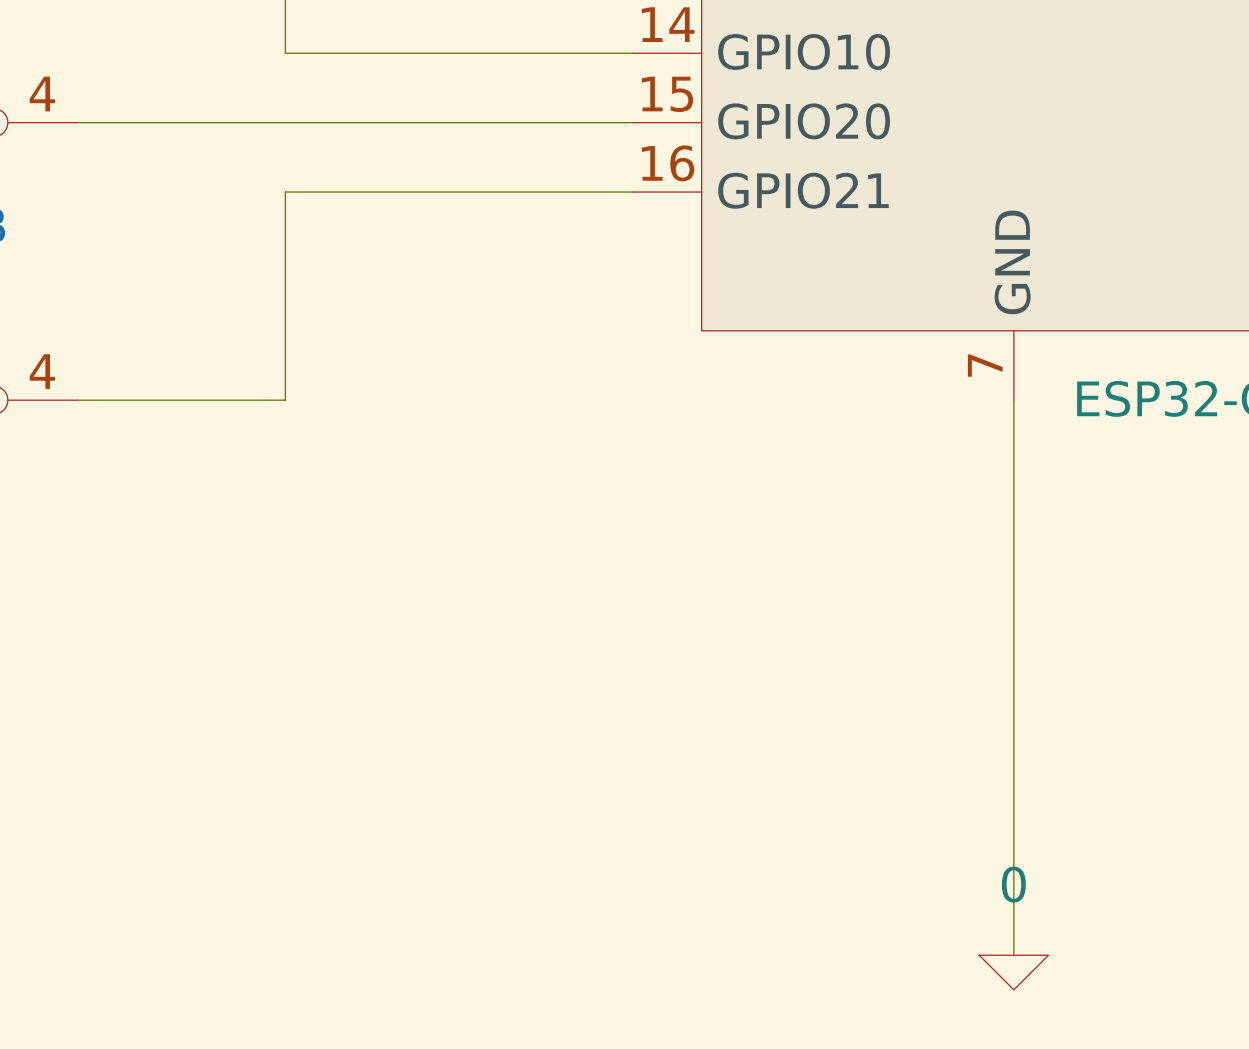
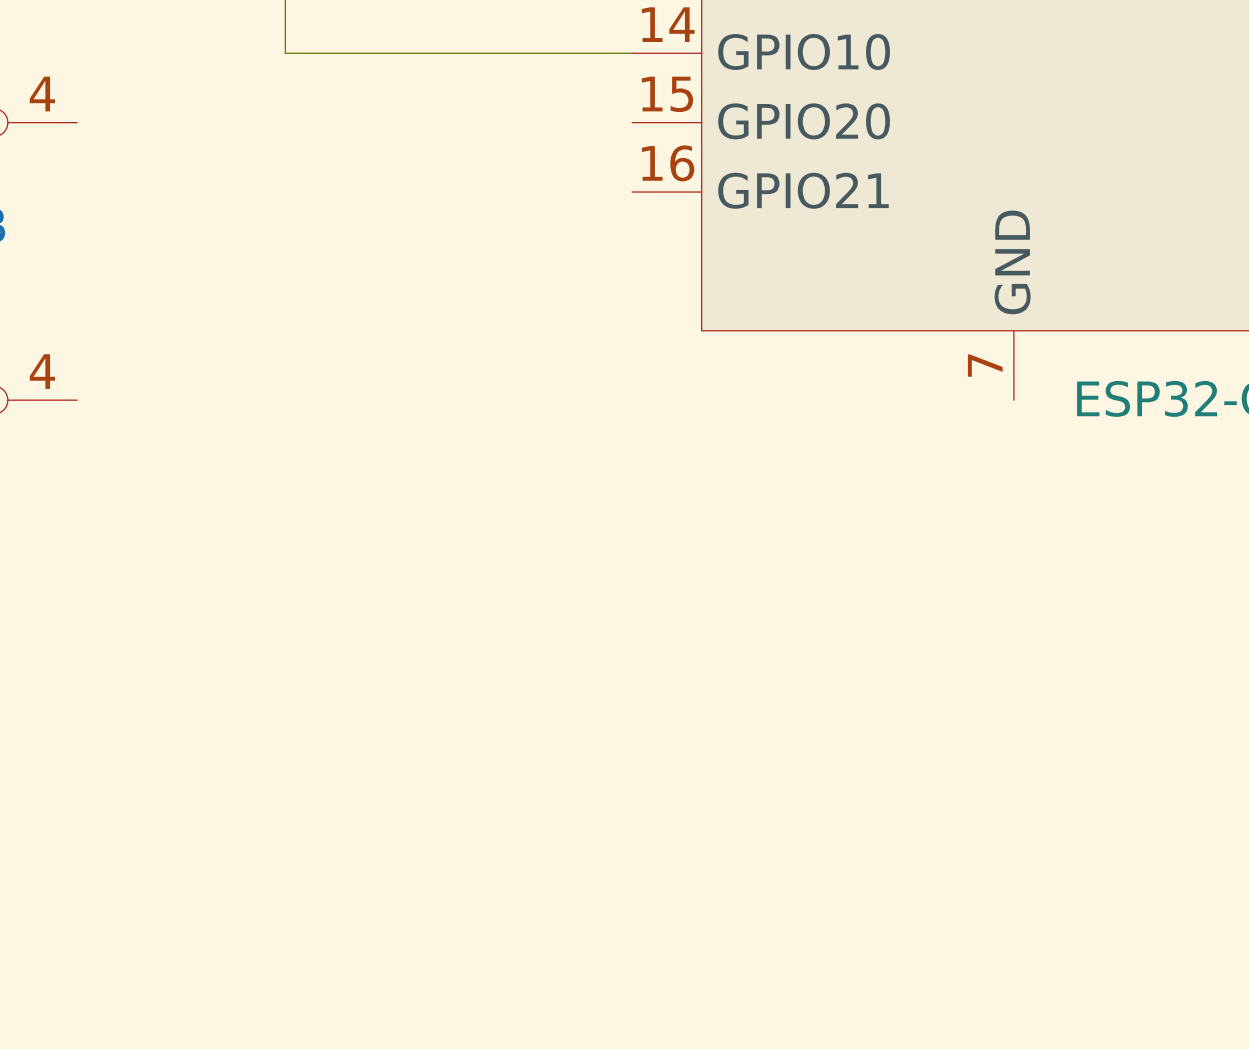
wire: (77, 122) (632, 122) -> none
wire: (632, 192) (285, 192) (285, 400) (77, 400) -> none
wire: (1013, 400) (1013, 955) -> none
power symbol: 0 (1013, 972) -> none

